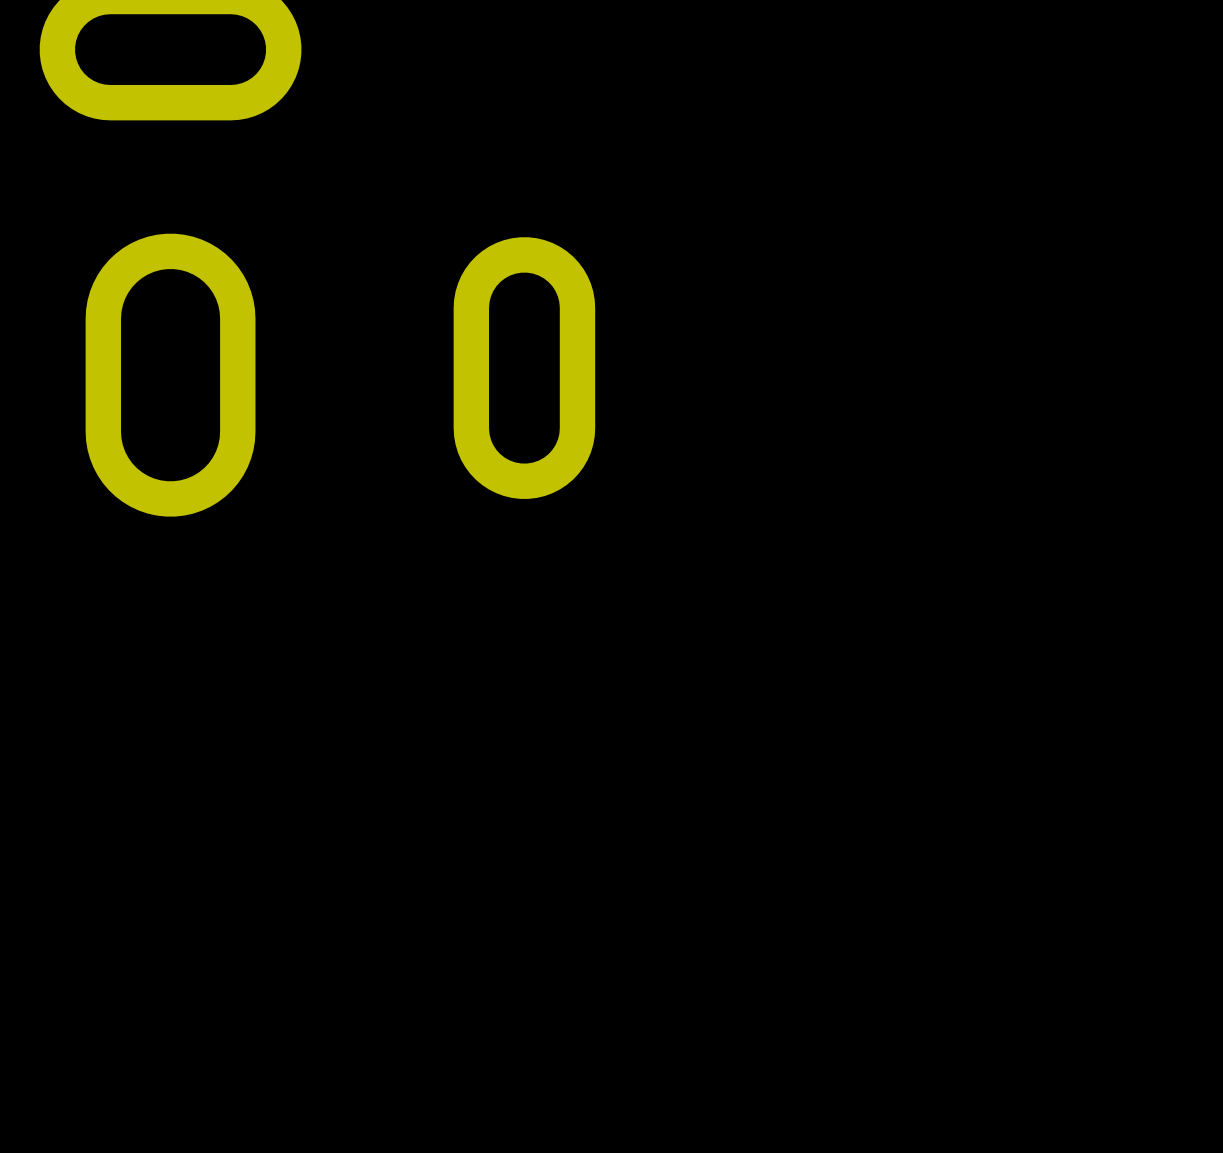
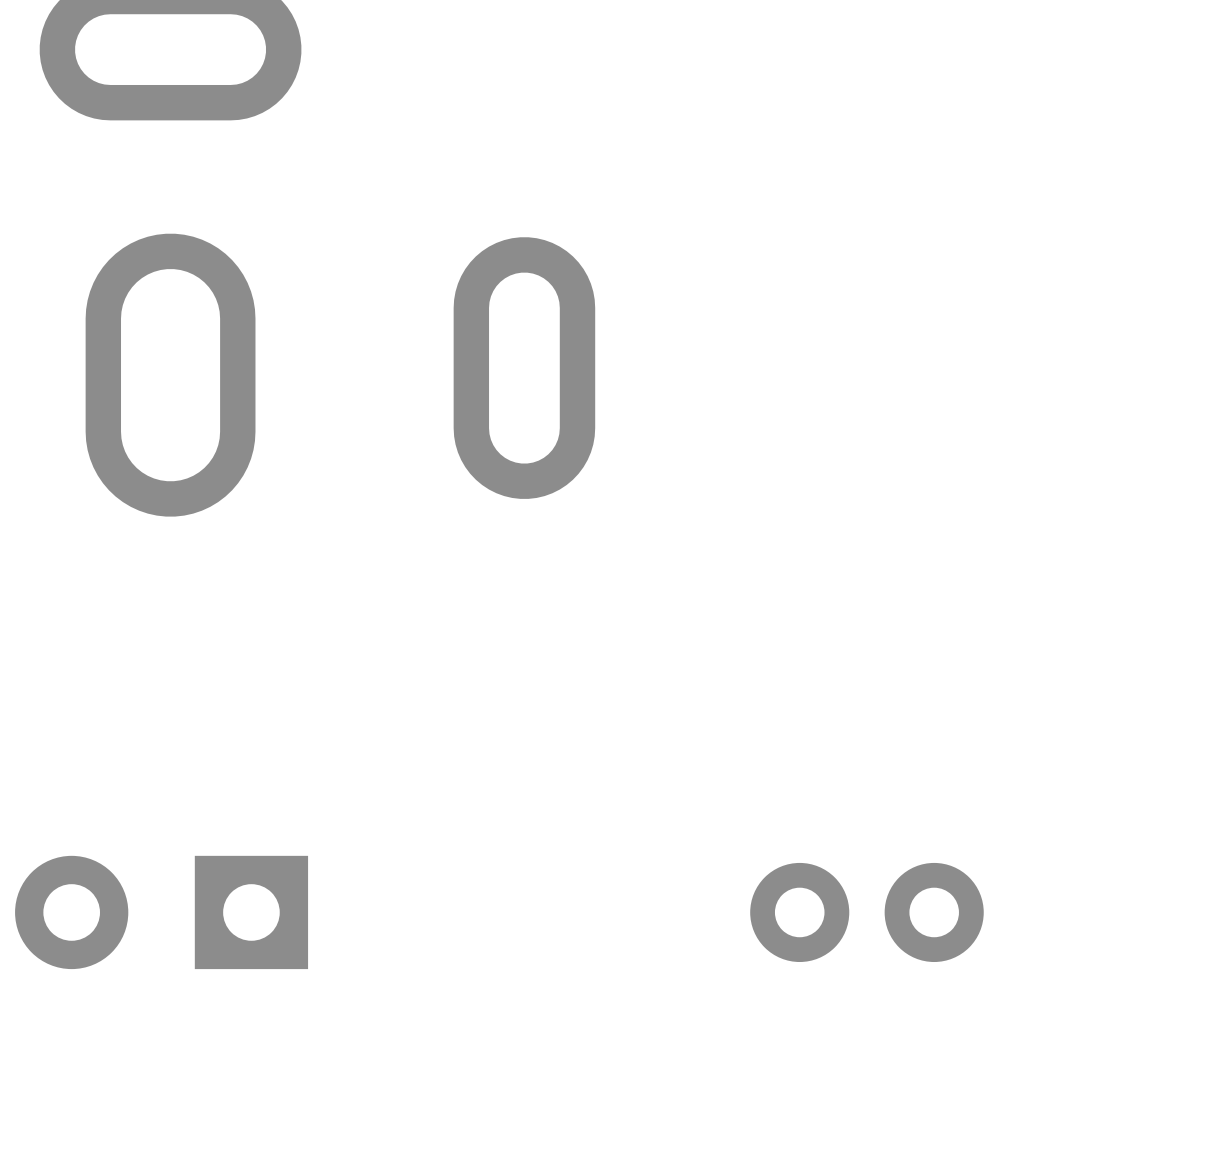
part: none -> (161, 912)
part: none -> (866, 912)

